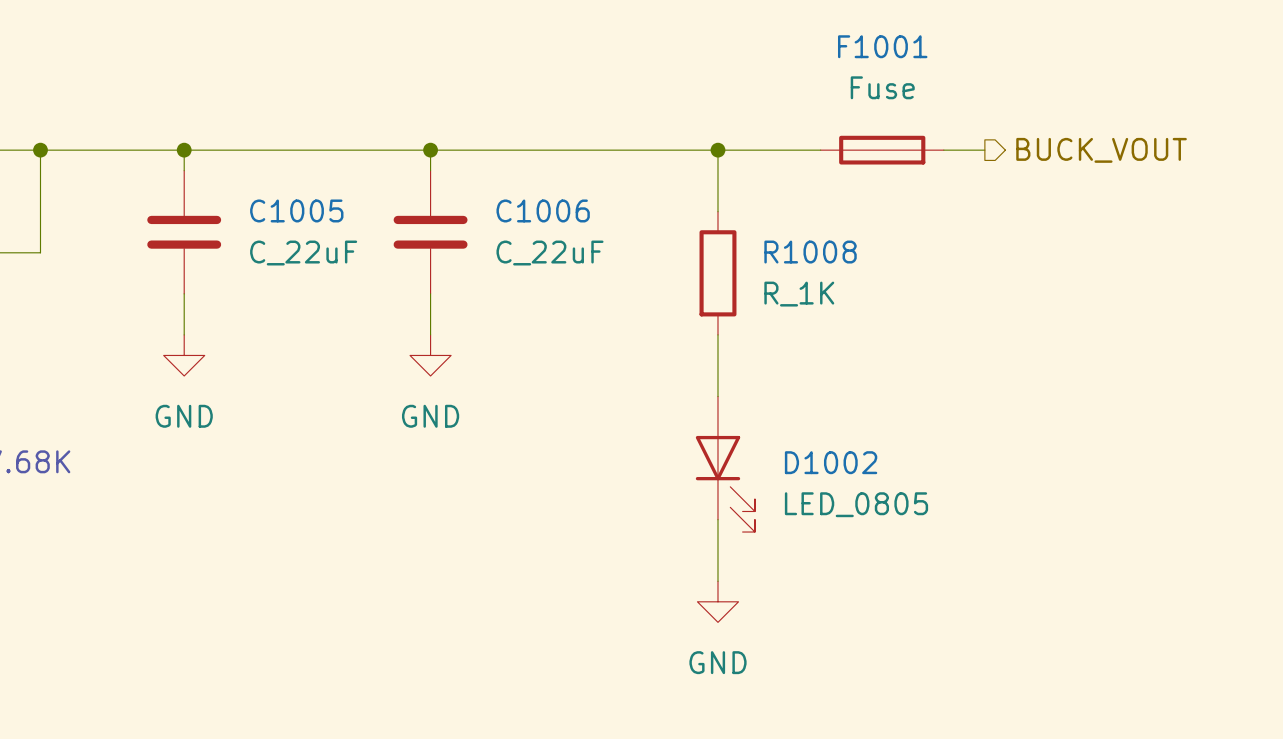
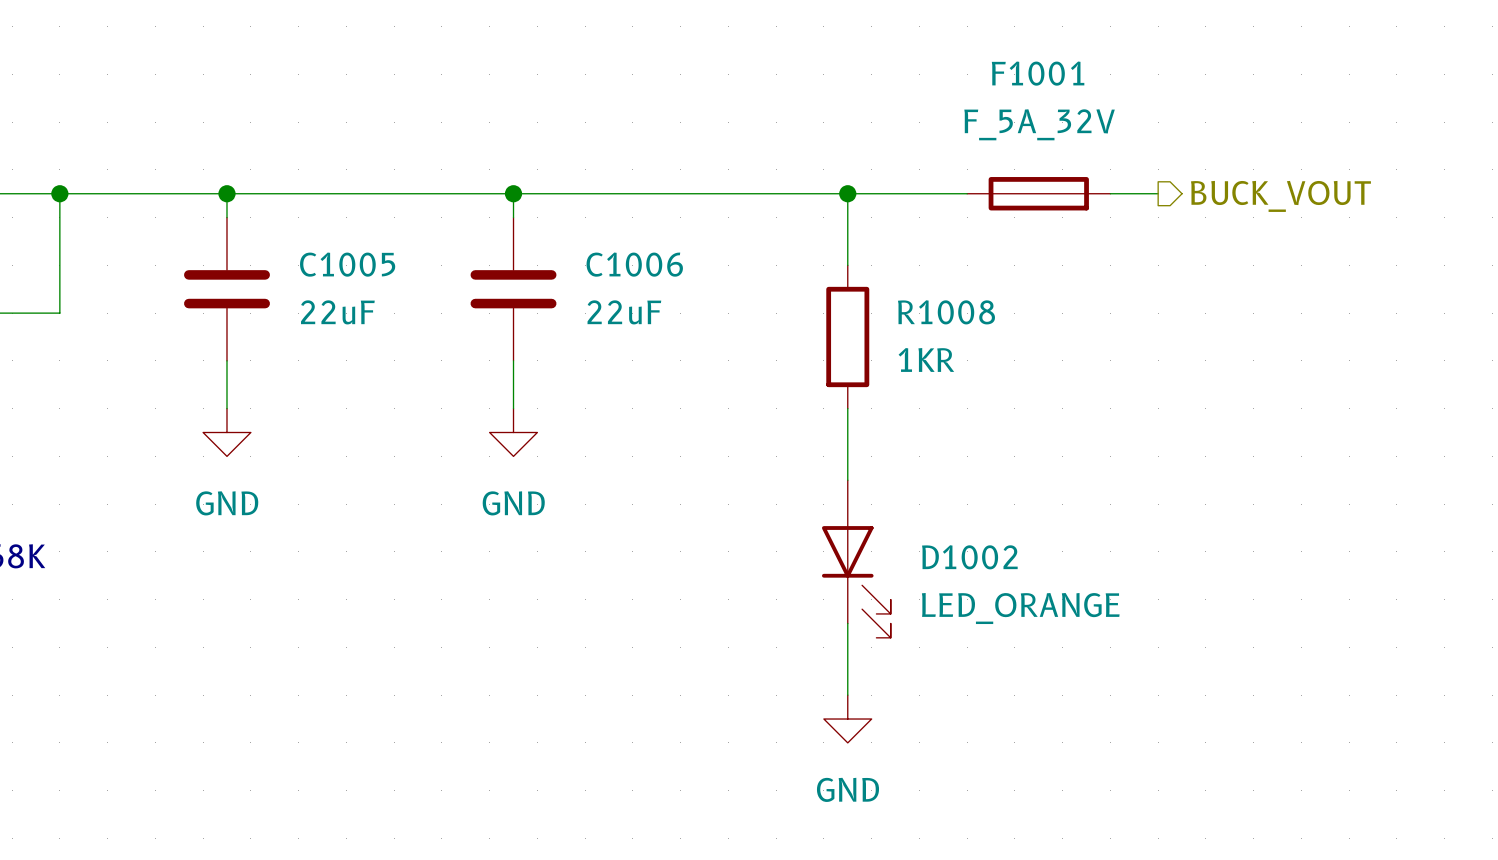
F1001 value: Fuse (882, 87) -> F_5A_32V (1039, 124)
C1005 value: C_22uF (303, 253) -> 22uF (337, 312)
C1006 value: C_22uF (549, 253) -> 22uF (624, 312)
R1008 value: R_1K (799, 294) -> 1KR (926, 359)
D1002 value: LED_0805 (856, 504) -> LED_ORANGE (1020, 608)

